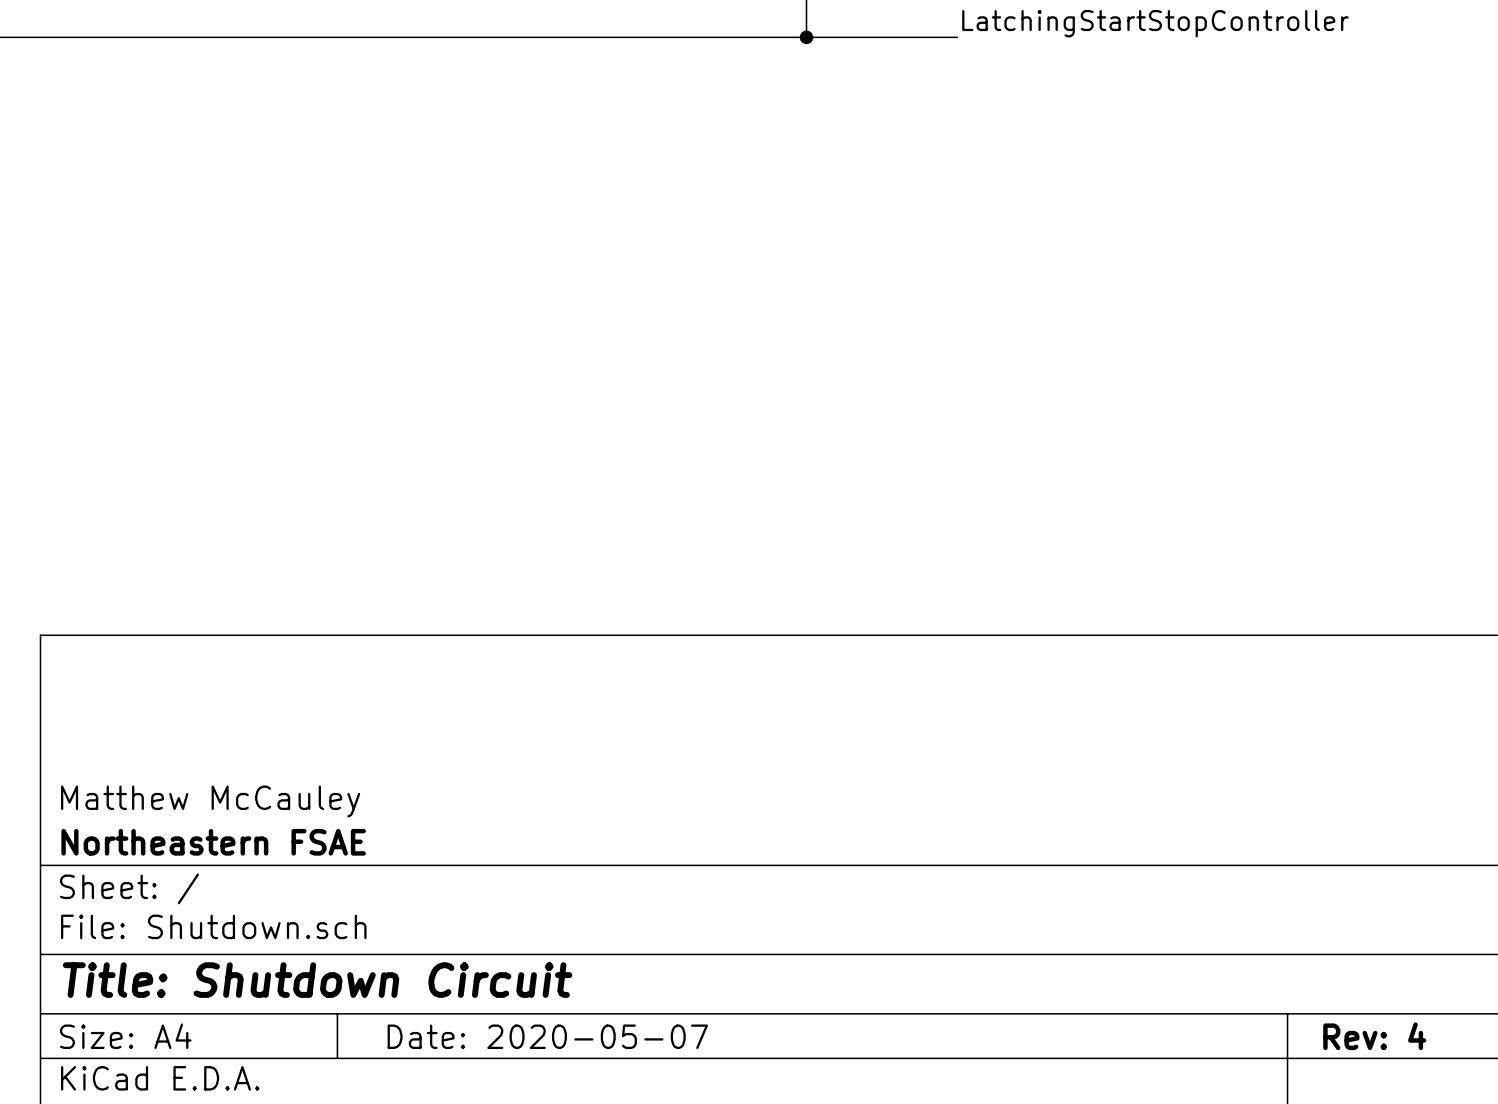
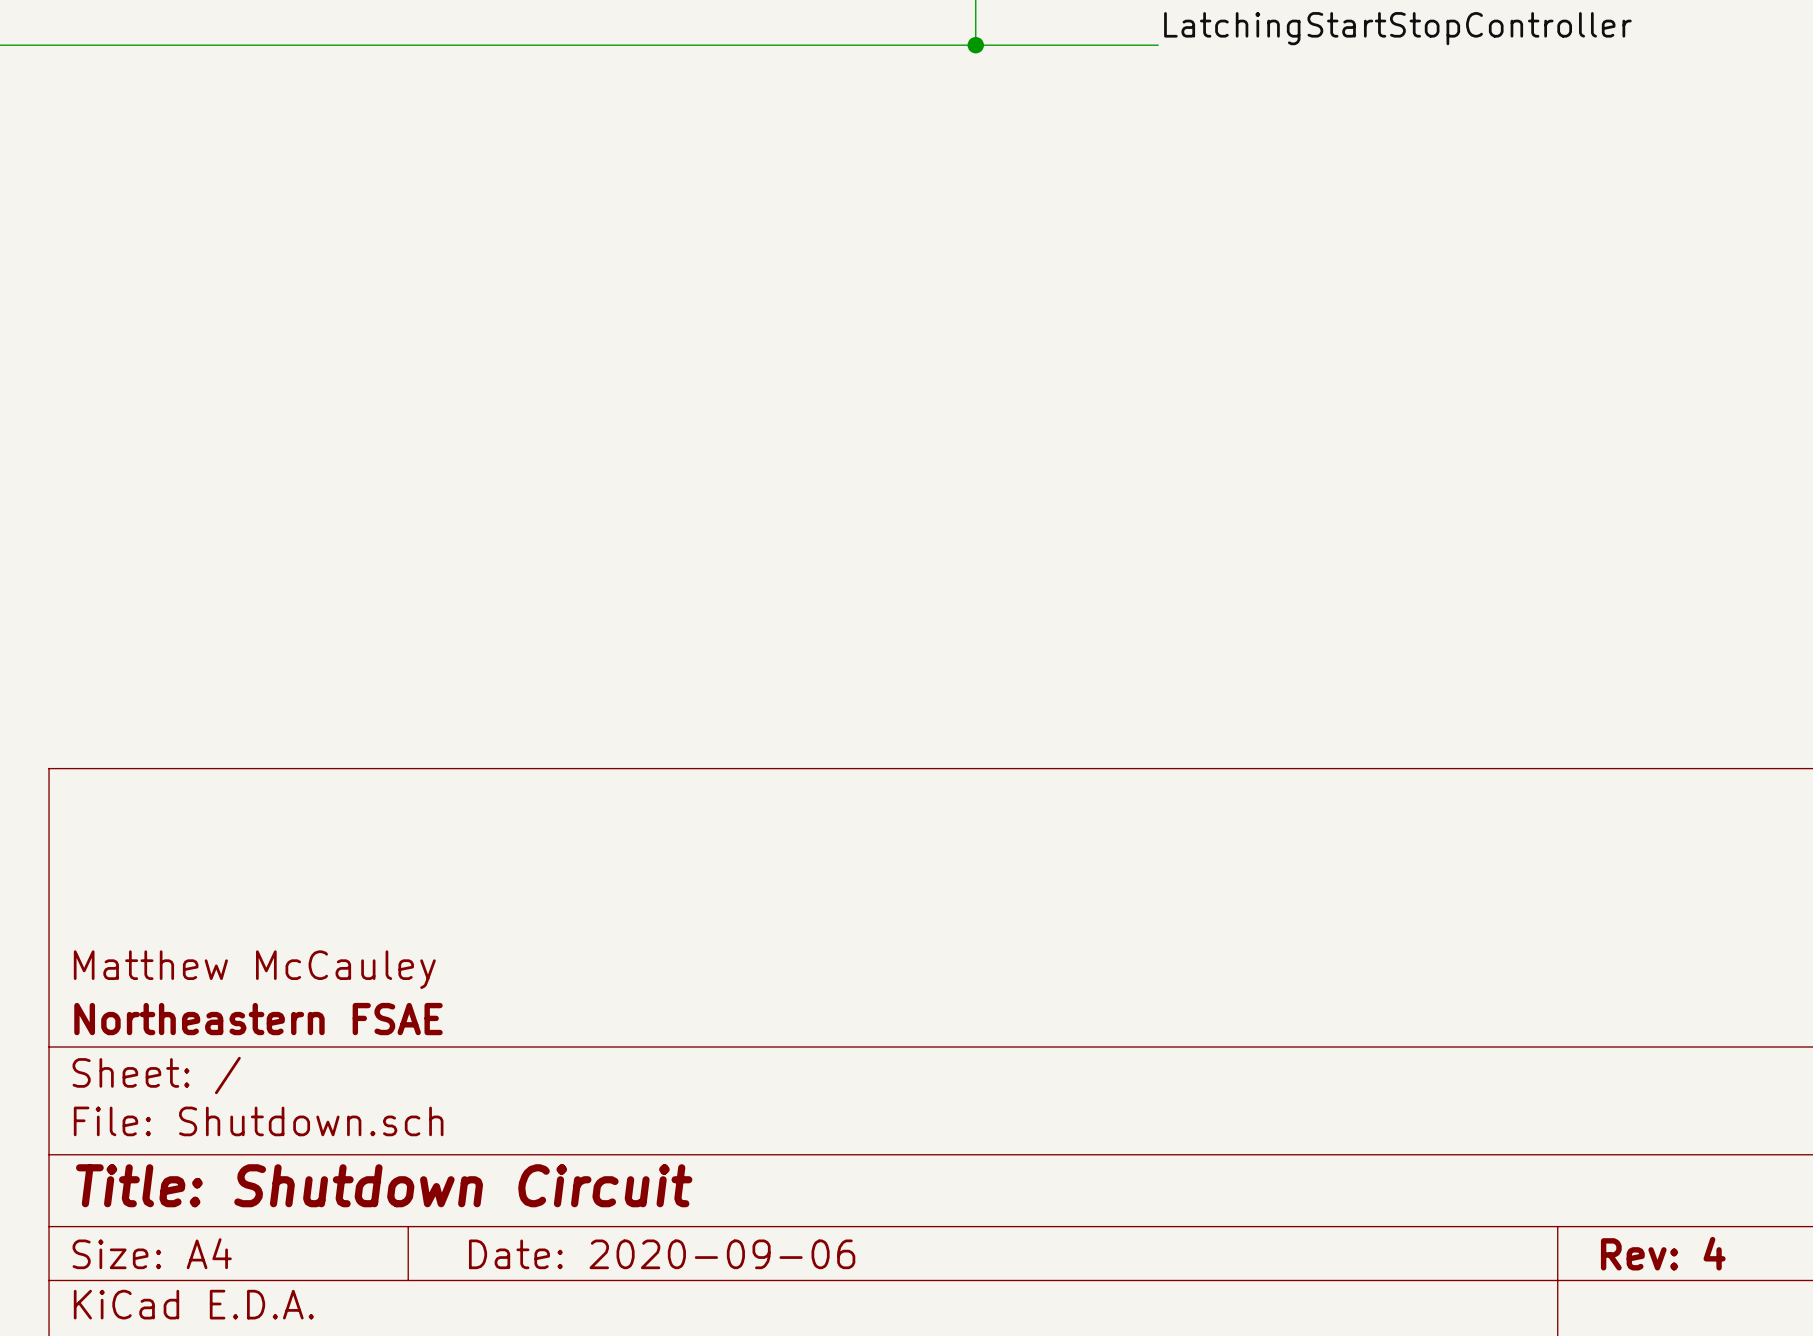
title block: Date: 2020-05-07 (547, 1036) -> Date: 2020-09-06 (662, 1254)

